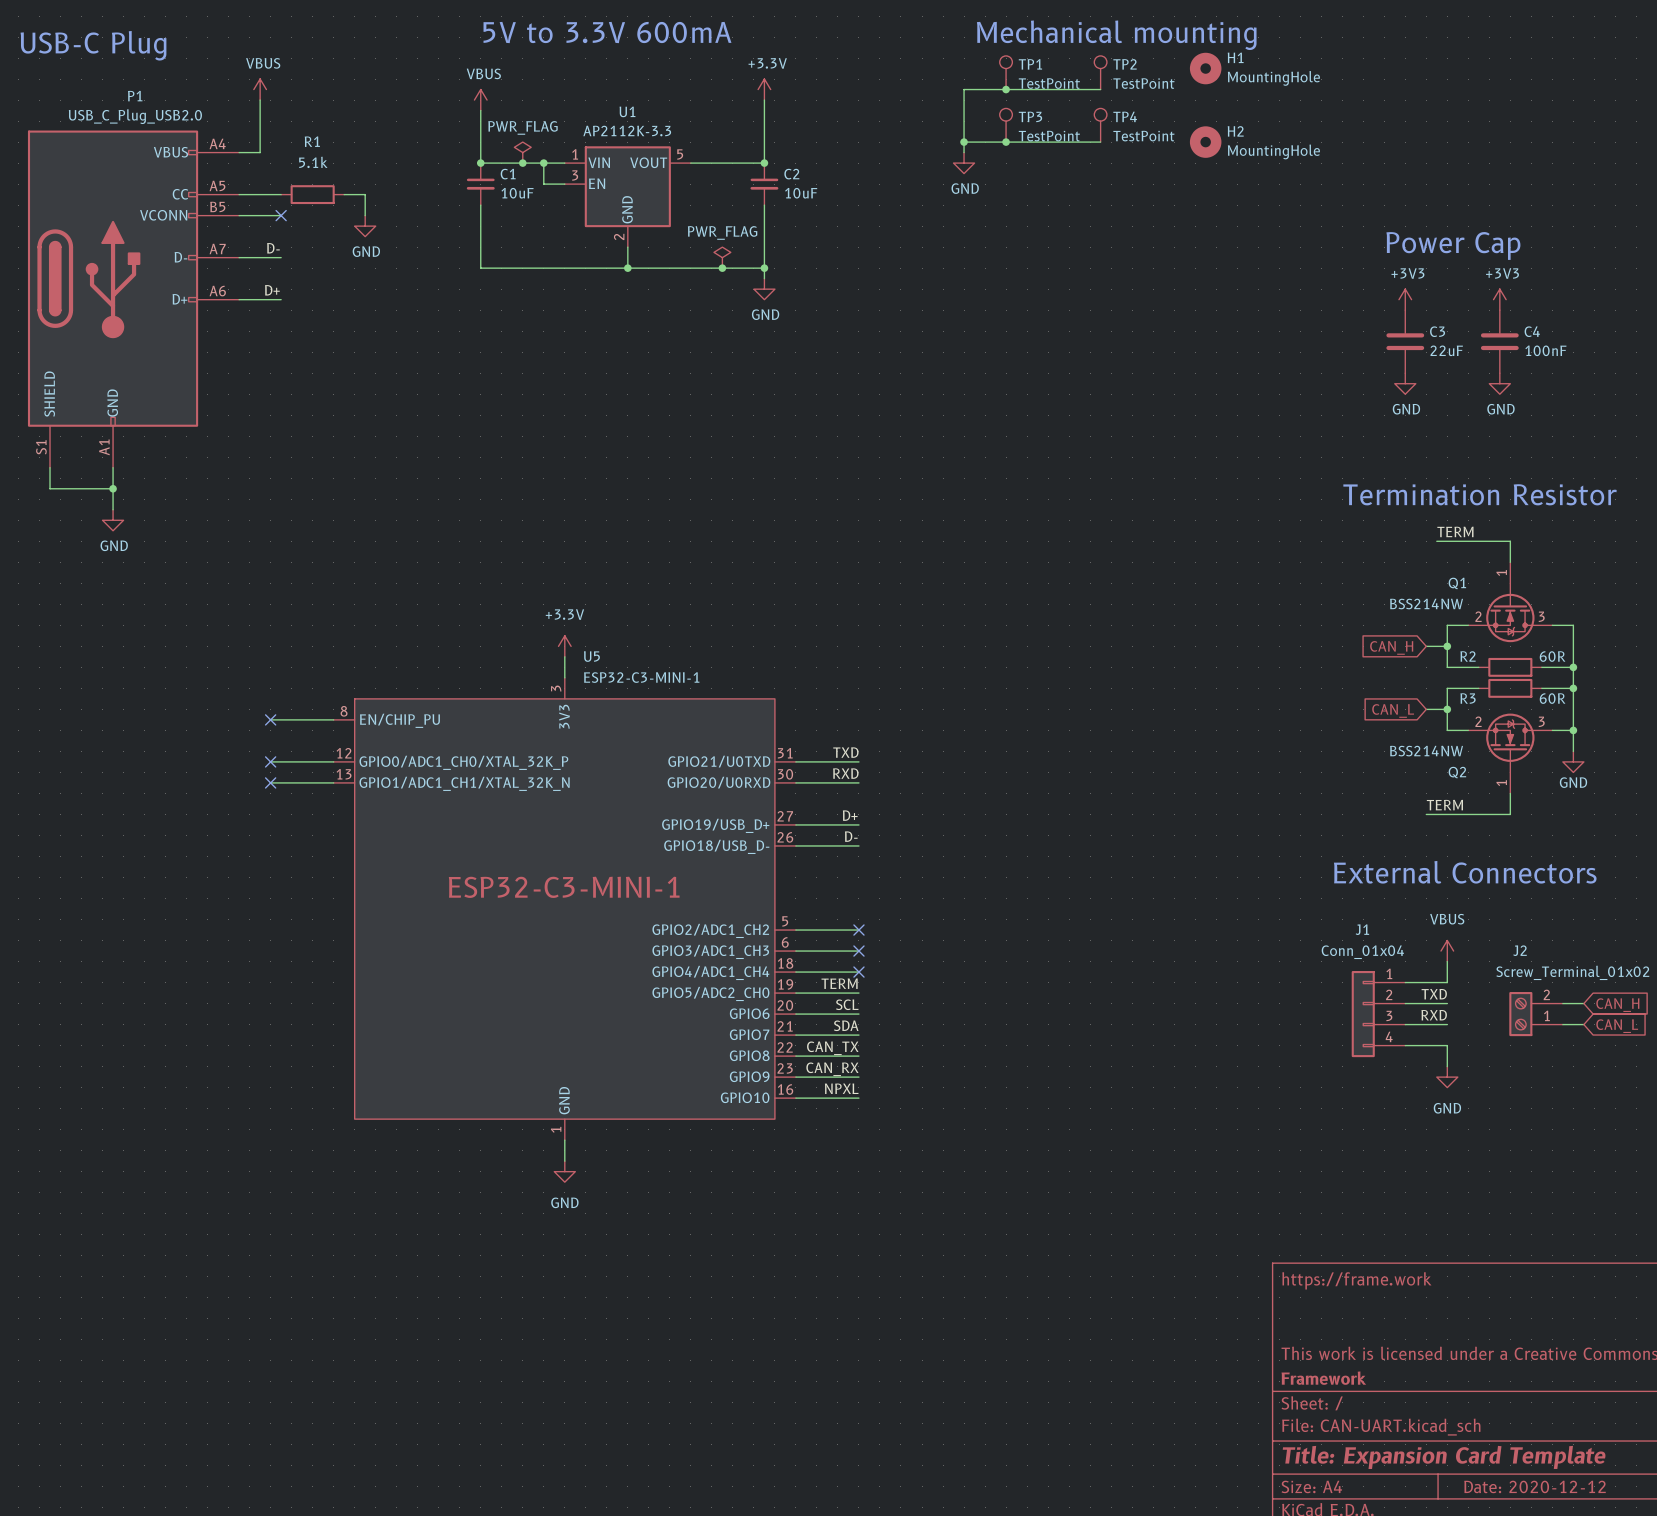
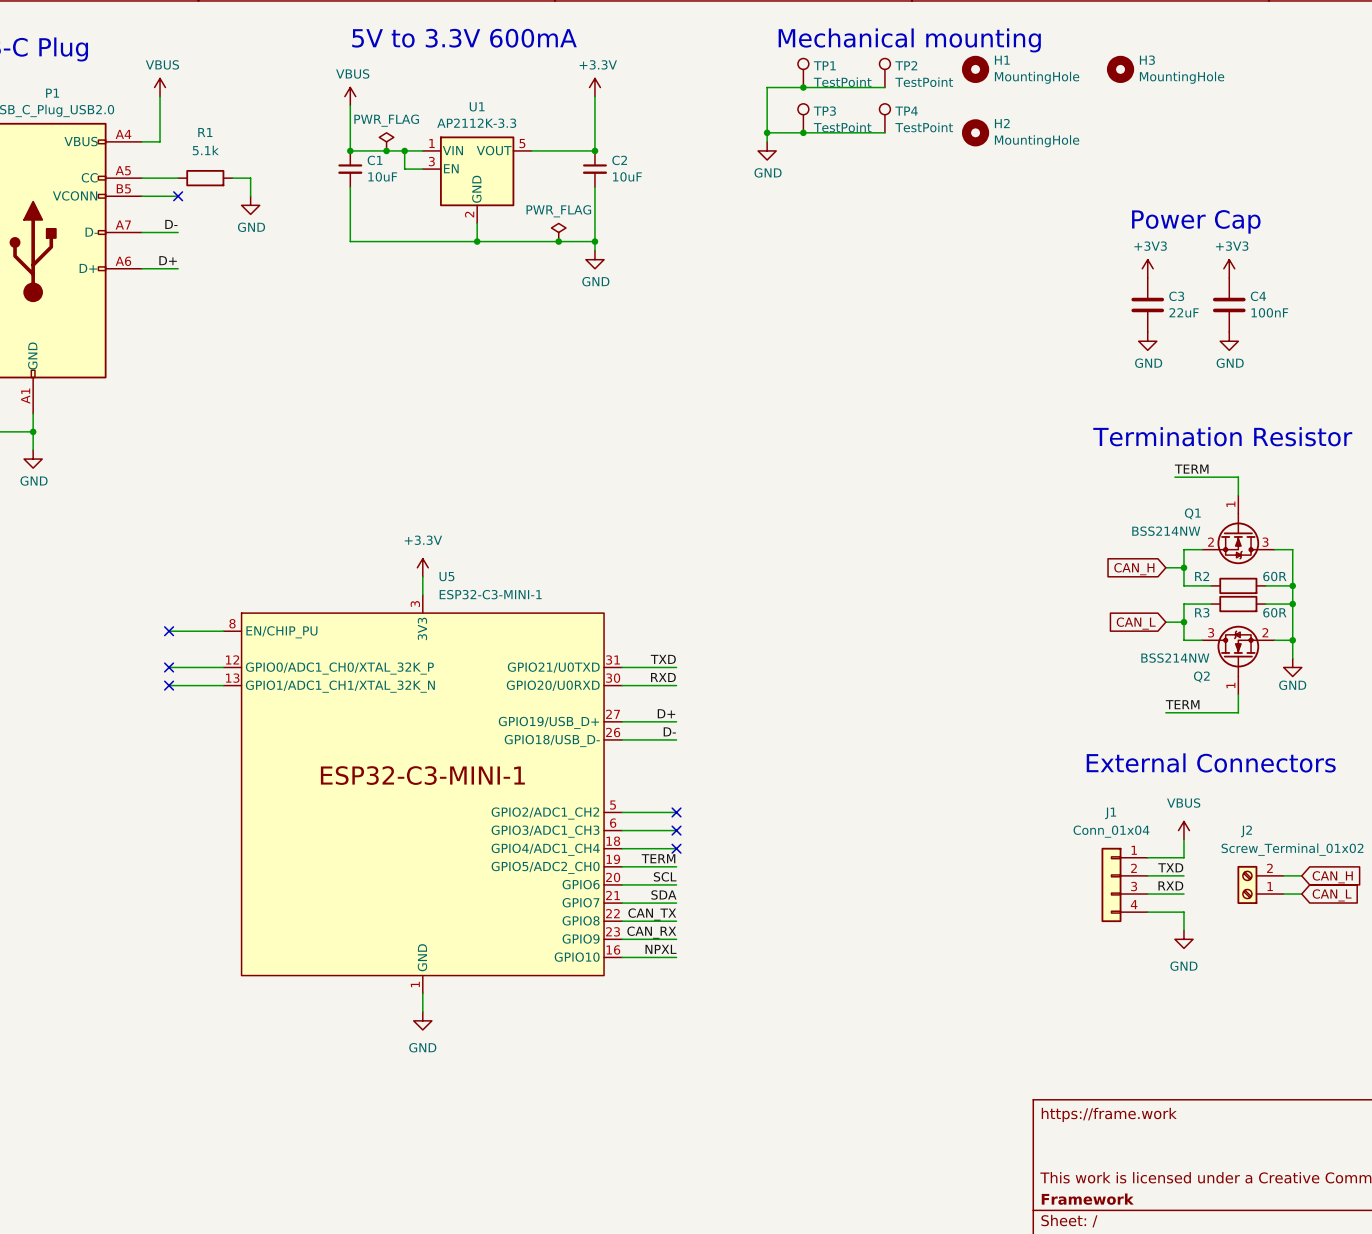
H3: none -> MountingHole (1120, 69)
Q2 flip: as is (1510, 743) -> left-right (1238, 651)

